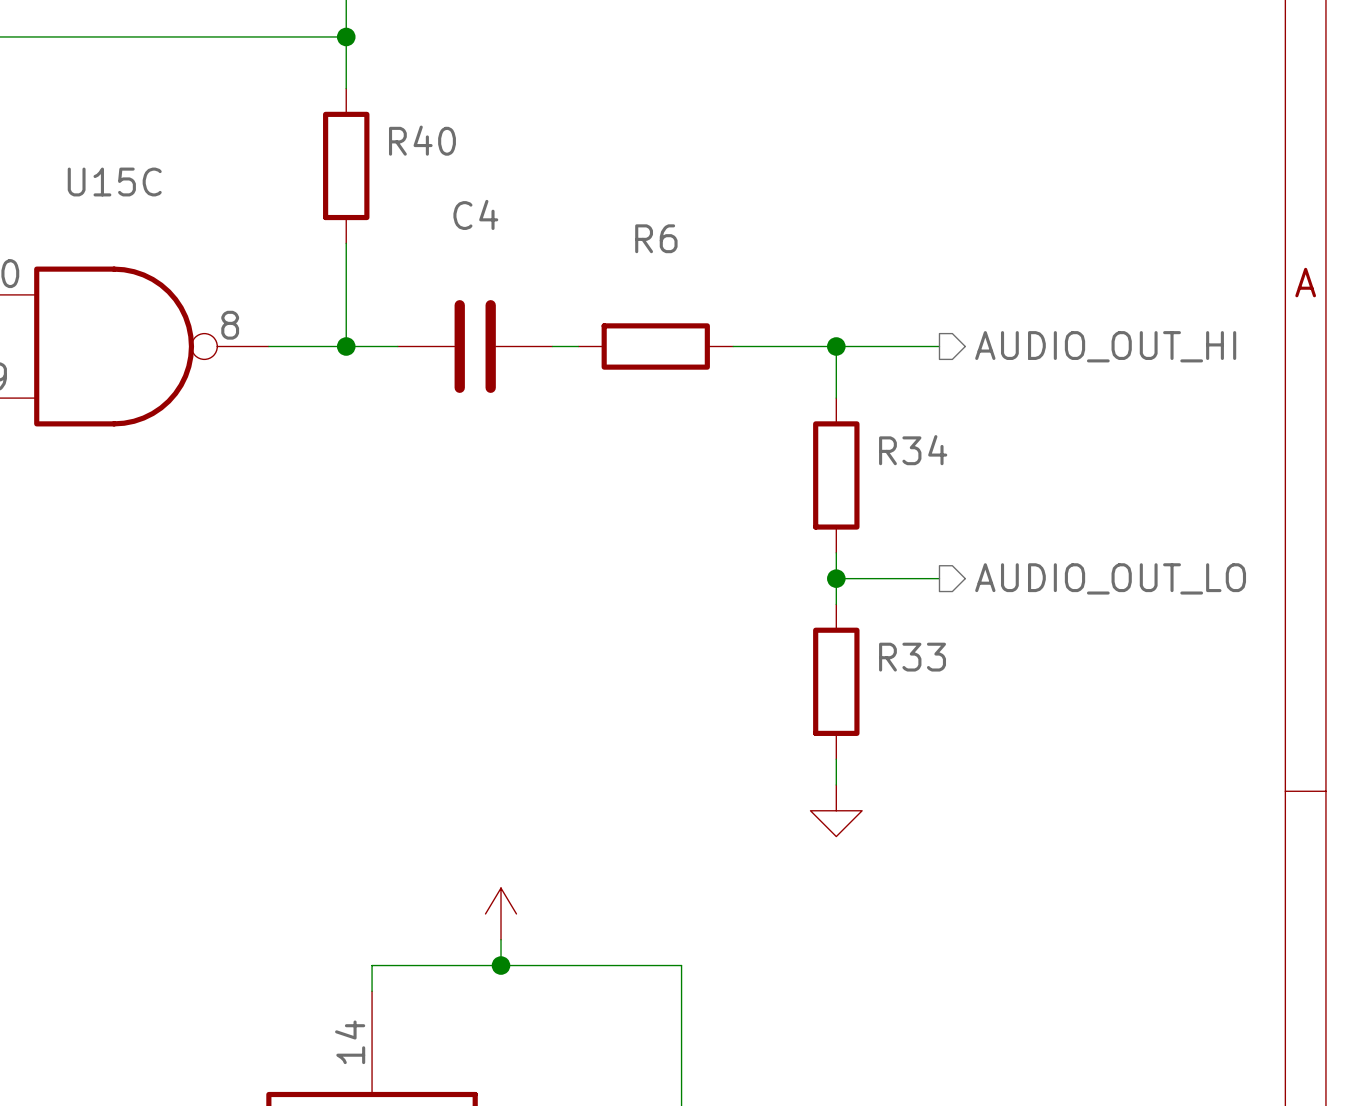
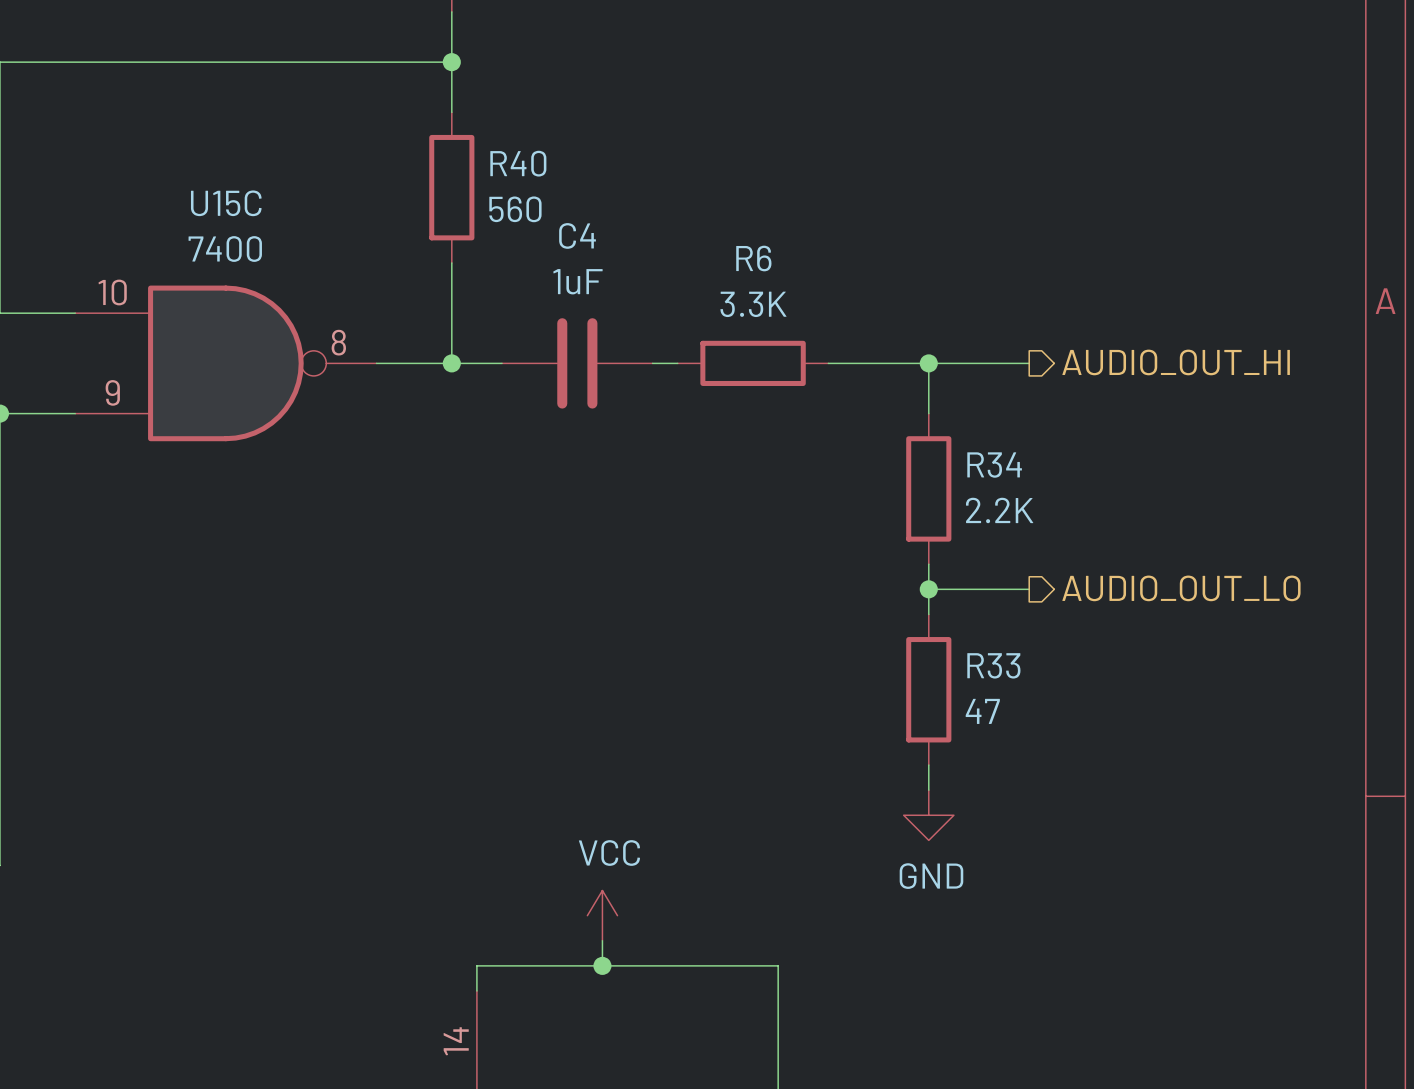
R40 value: none -> 560 (515, 209)
U15C value: none -> 7400 (225, 249)
C4 value: none -> 1uF (577, 281)
R6 value: none -> 3.3K (753, 304)
R34 value: none -> 2.2K (999, 510)
R33 value: none -> 47 (982, 711)
power symbol text: none -> VCC (609, 853)
power symbol text: none -> GND (931, 876)

